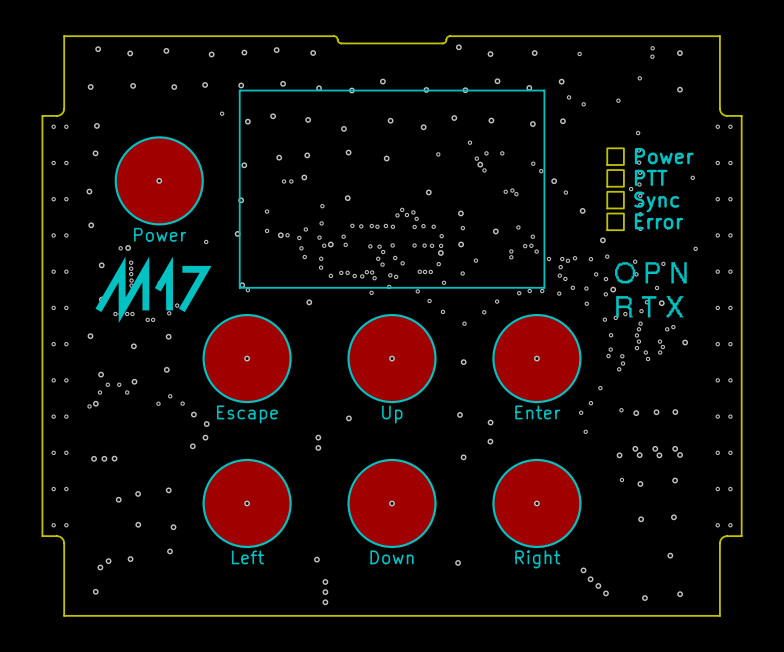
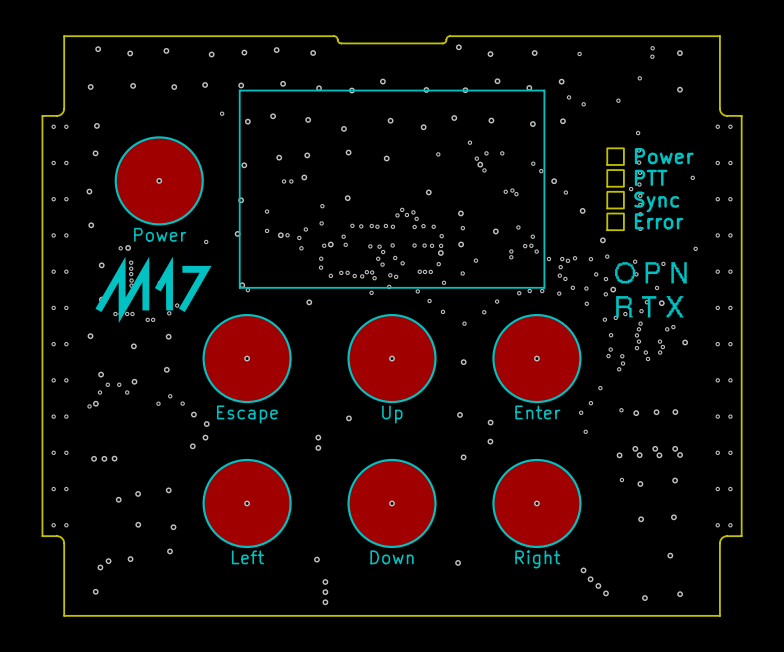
via: (319, 237) -> none
via: (304, 257) -> none

